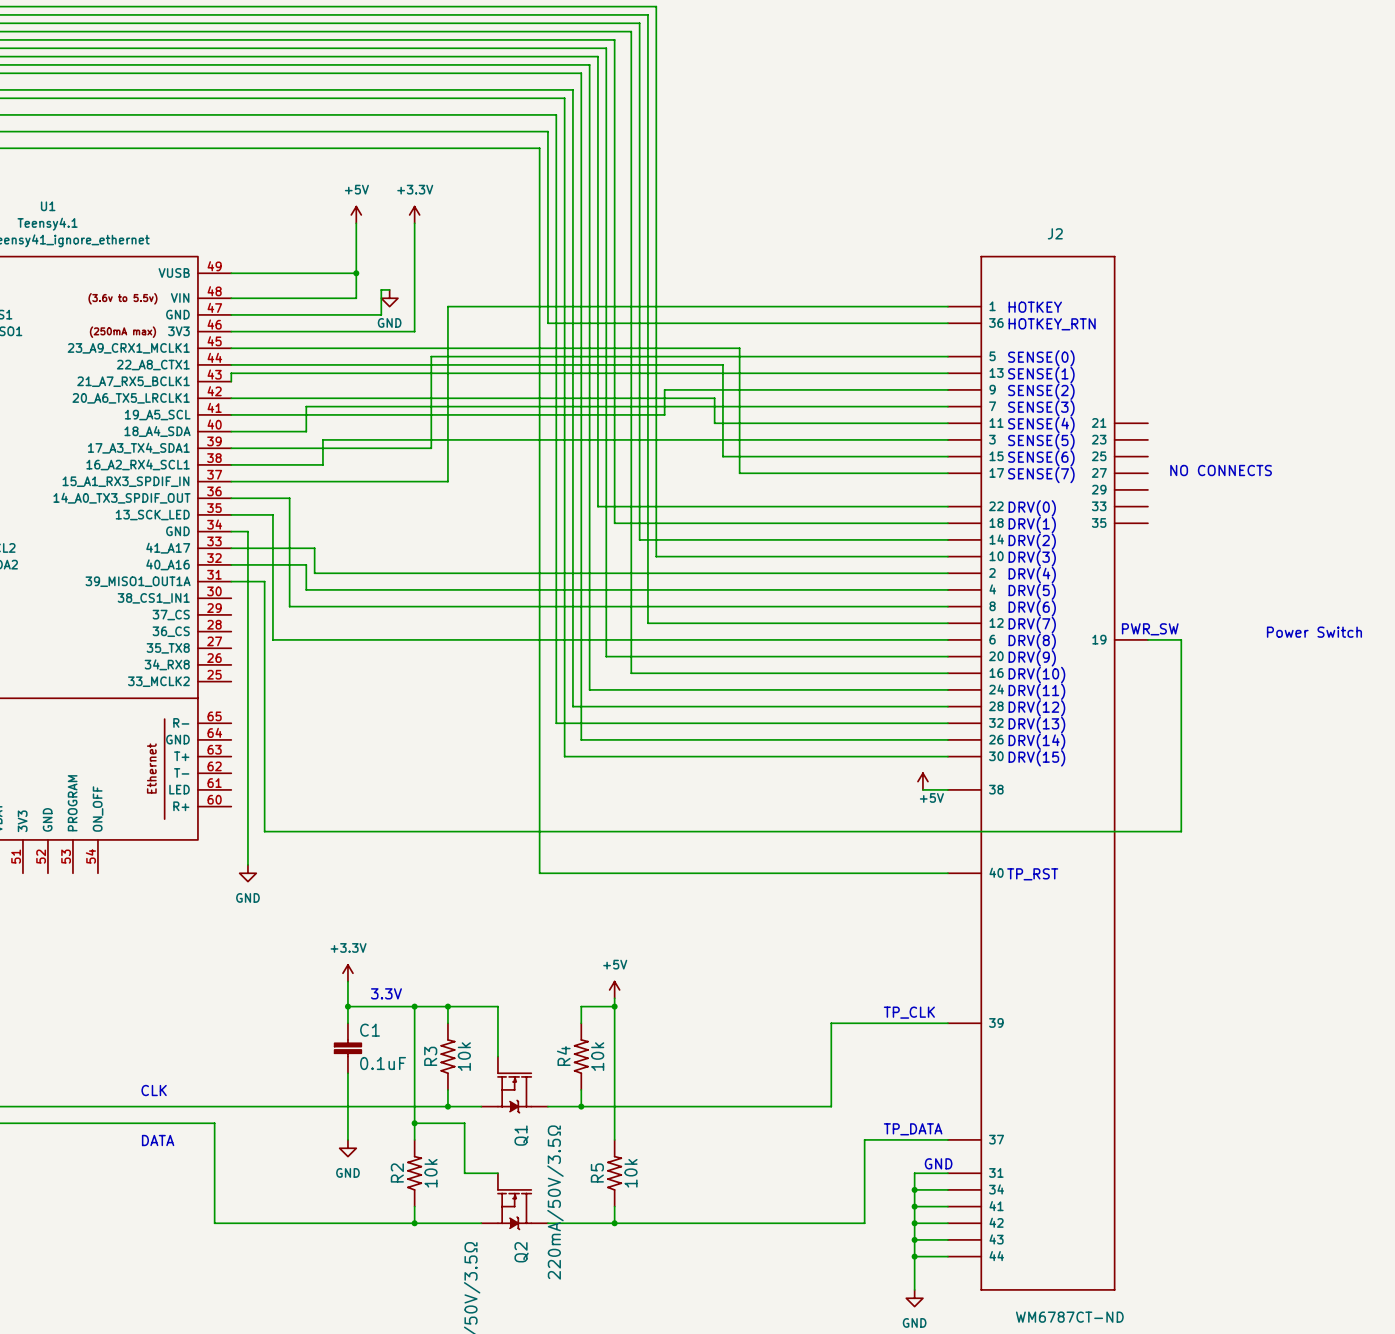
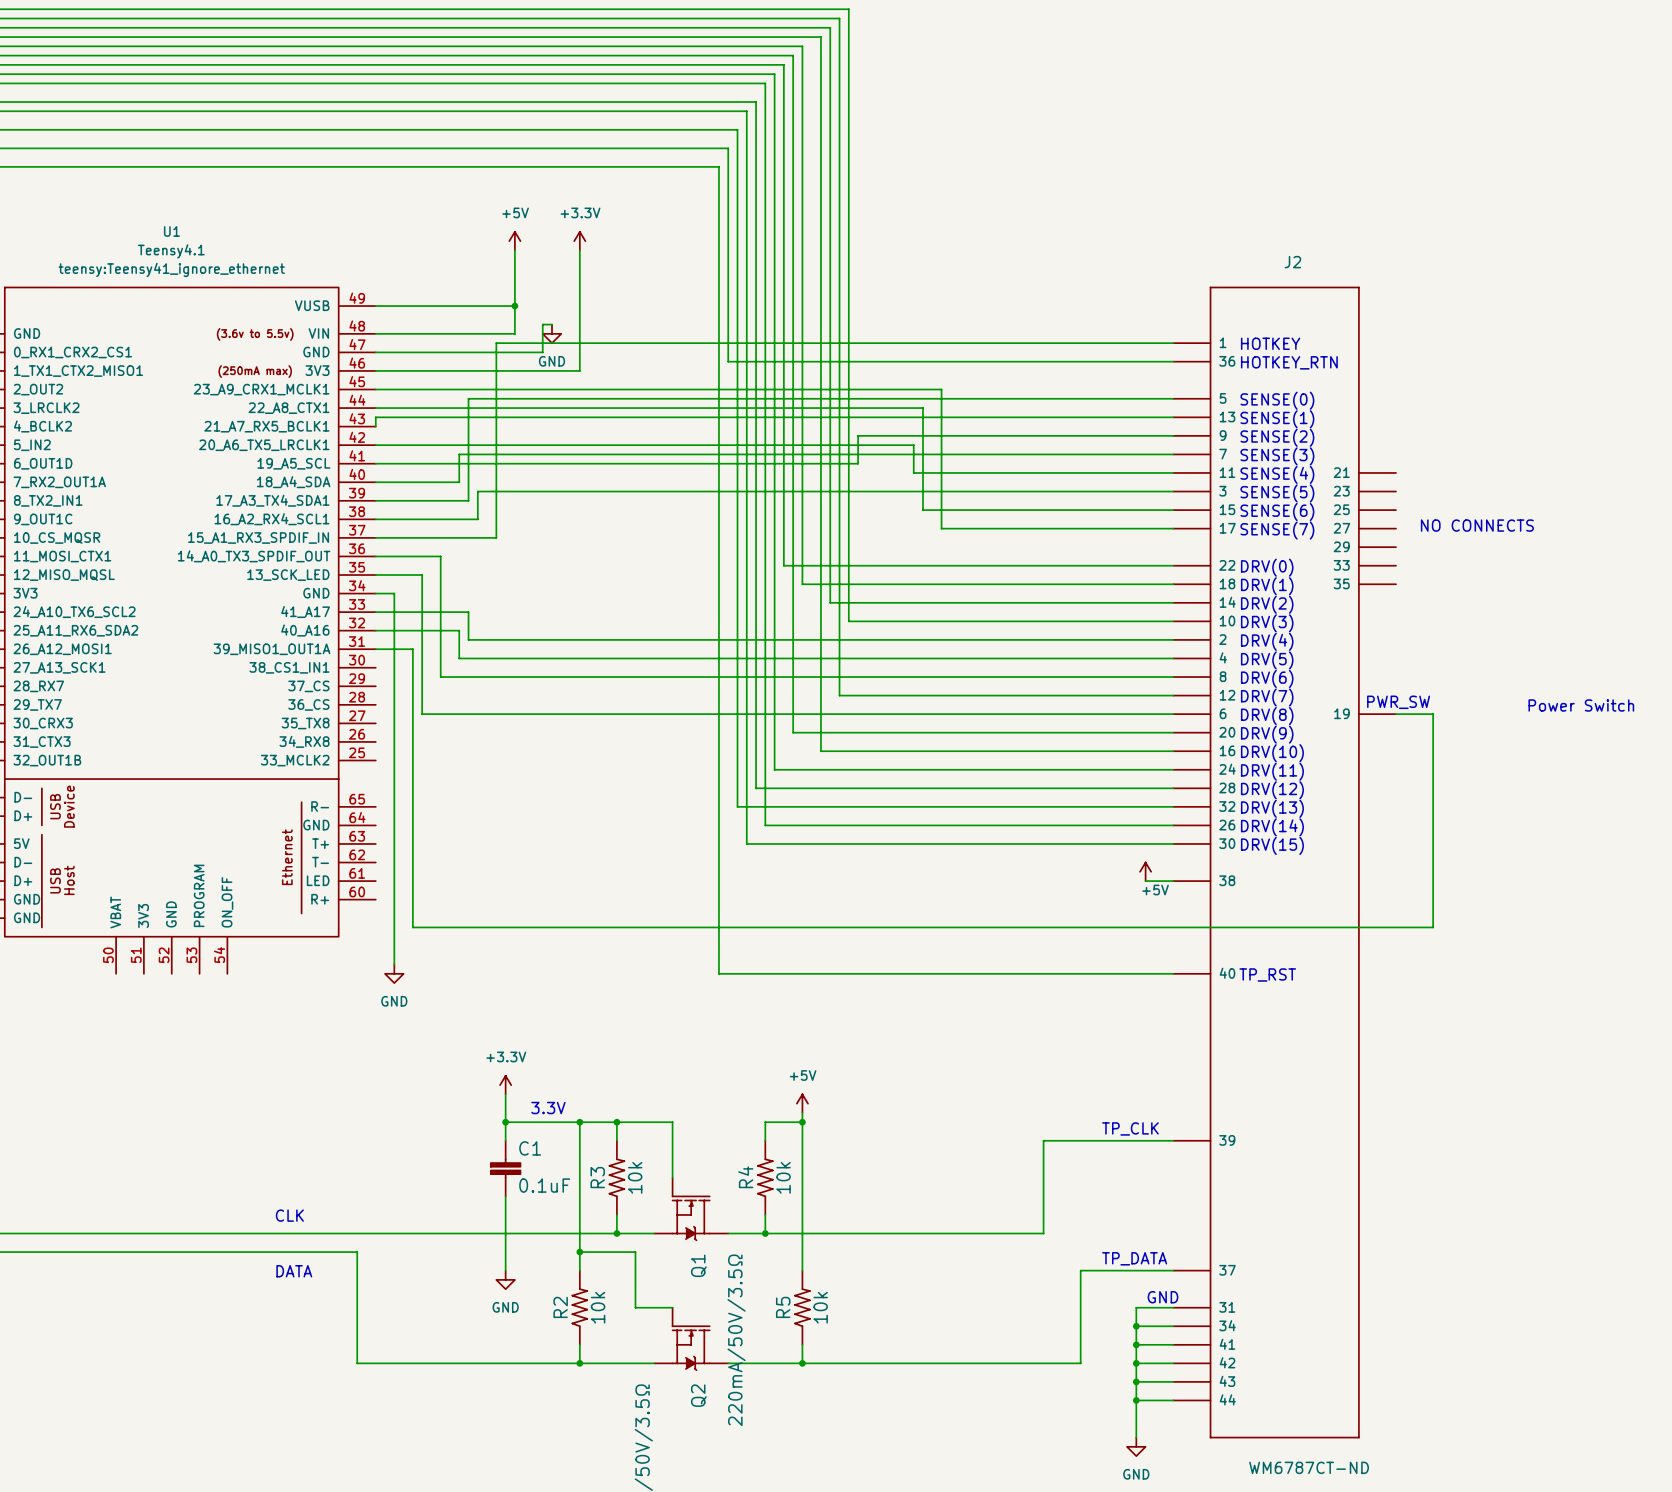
wire: (447, 306) (447, 481) (339, 481) -> (616, 343) (496, 343) (496, 537)
wire: (431, 356) (431, 448) (314, 448) -> (598, 398) (468, 398) (468, 500)

